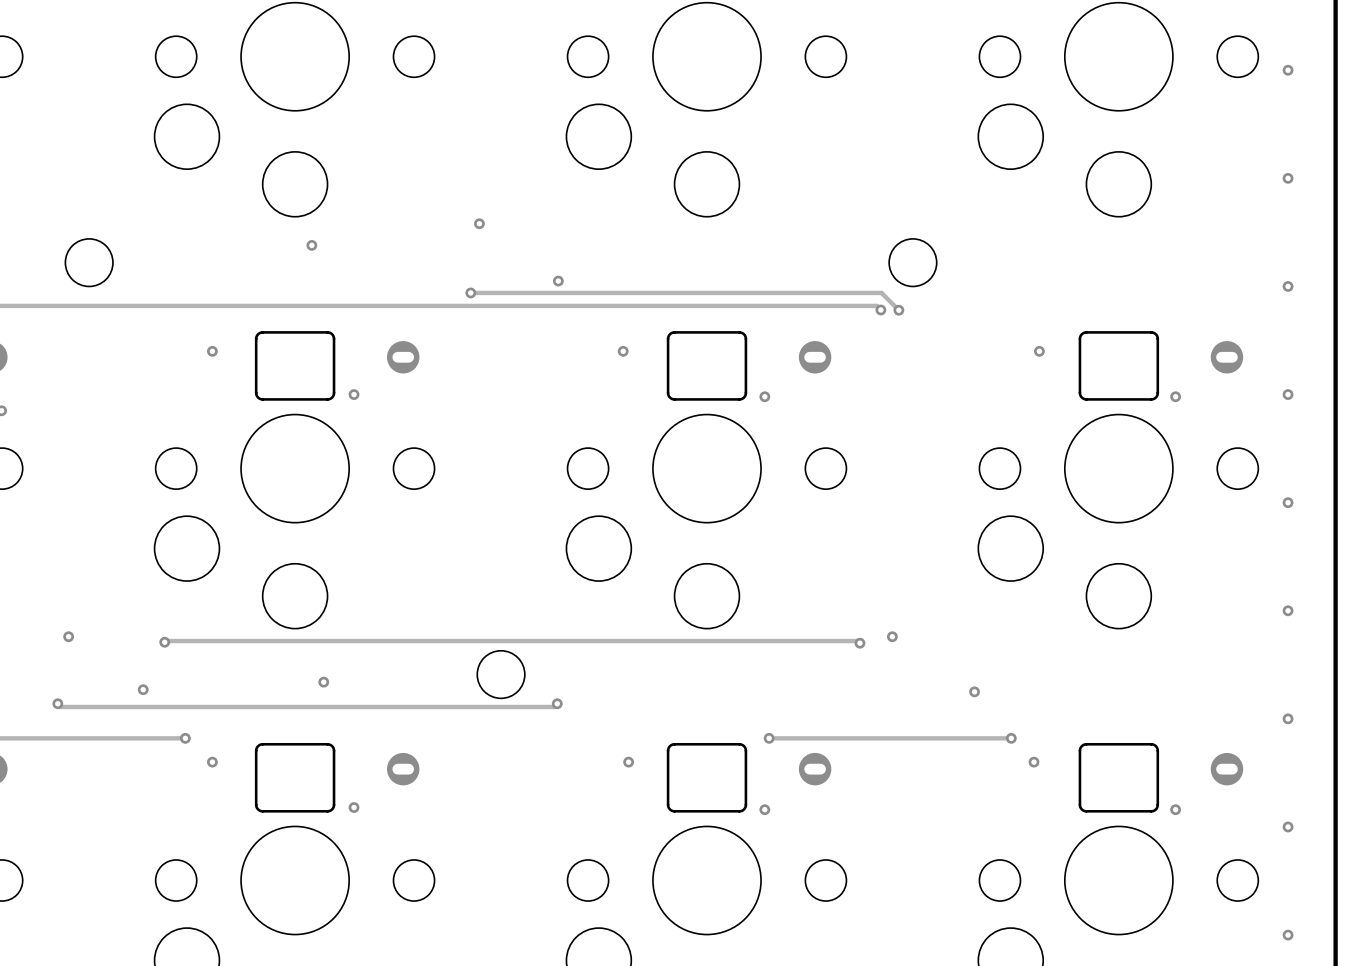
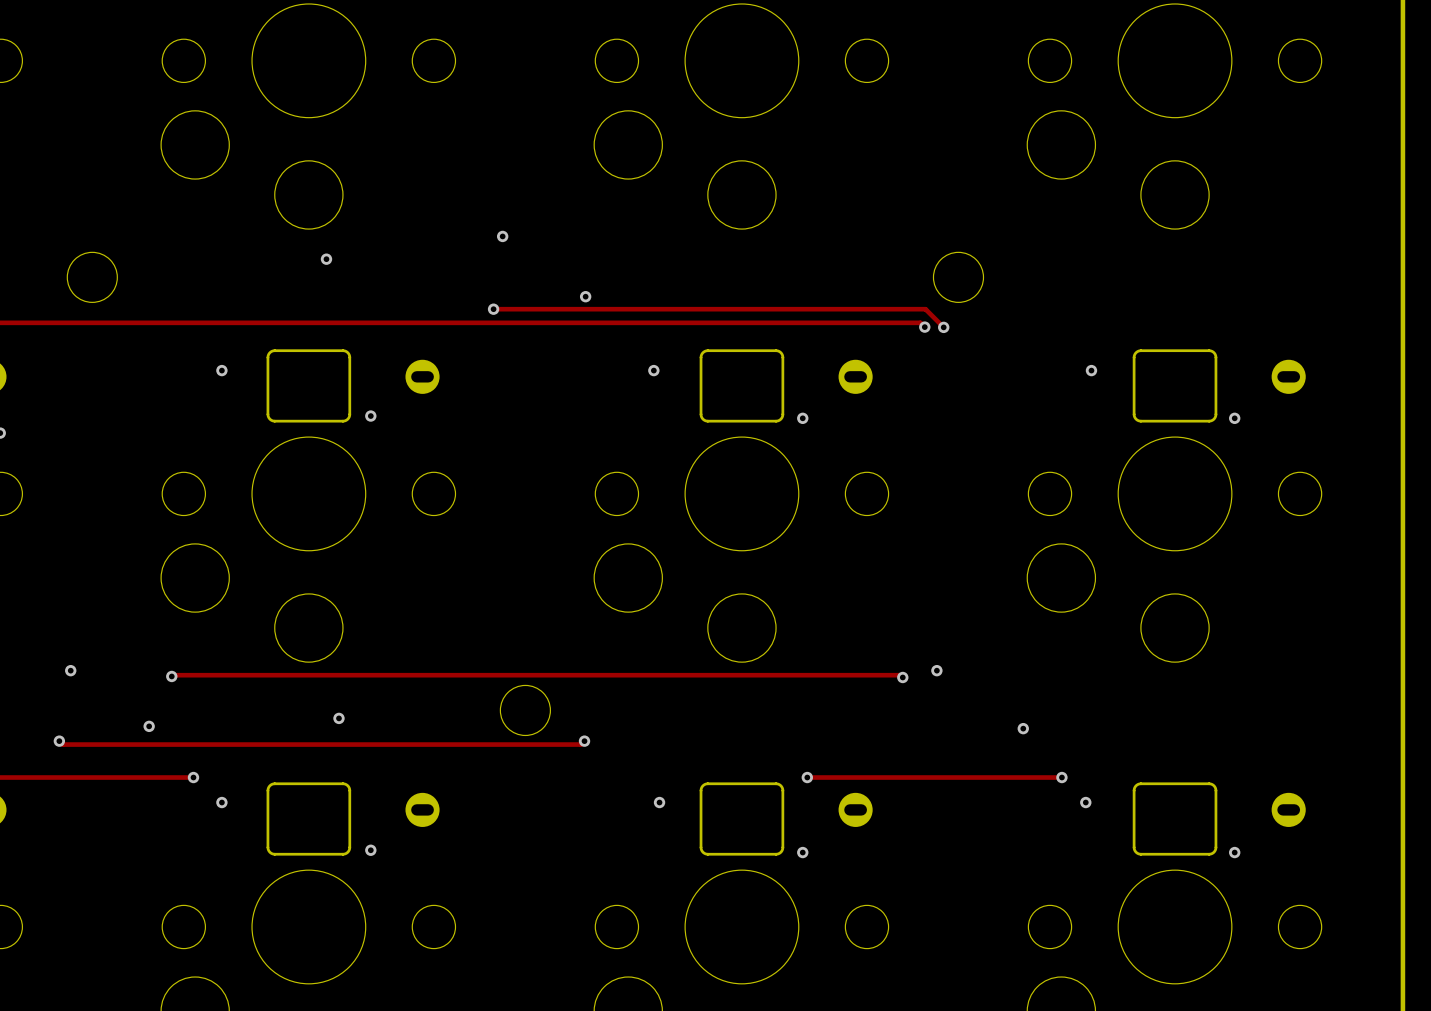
via: (1288, 70) -> none
via: (1288, 178) -> none
via: (1288, 286) -> none
via: (1288, 394) -> none
via: (1288, 502) -> none
via: (1288, 610) -> none
via: (1288, 718) -> none
via: (1288, 826) -> none
via: (1288, 935) -> none

